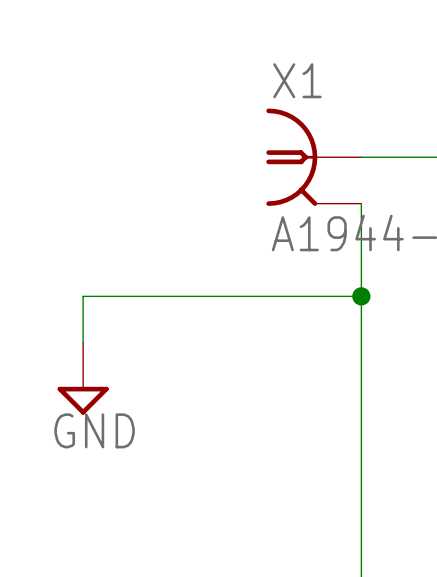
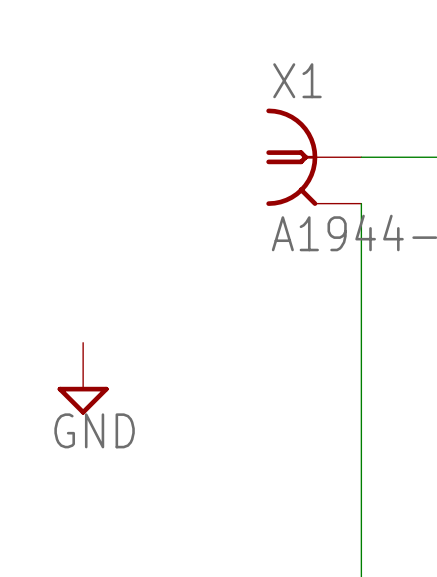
wire: (361, 296) (83, 296) (83, 342) -> none
junction: (361, 296) -> none

